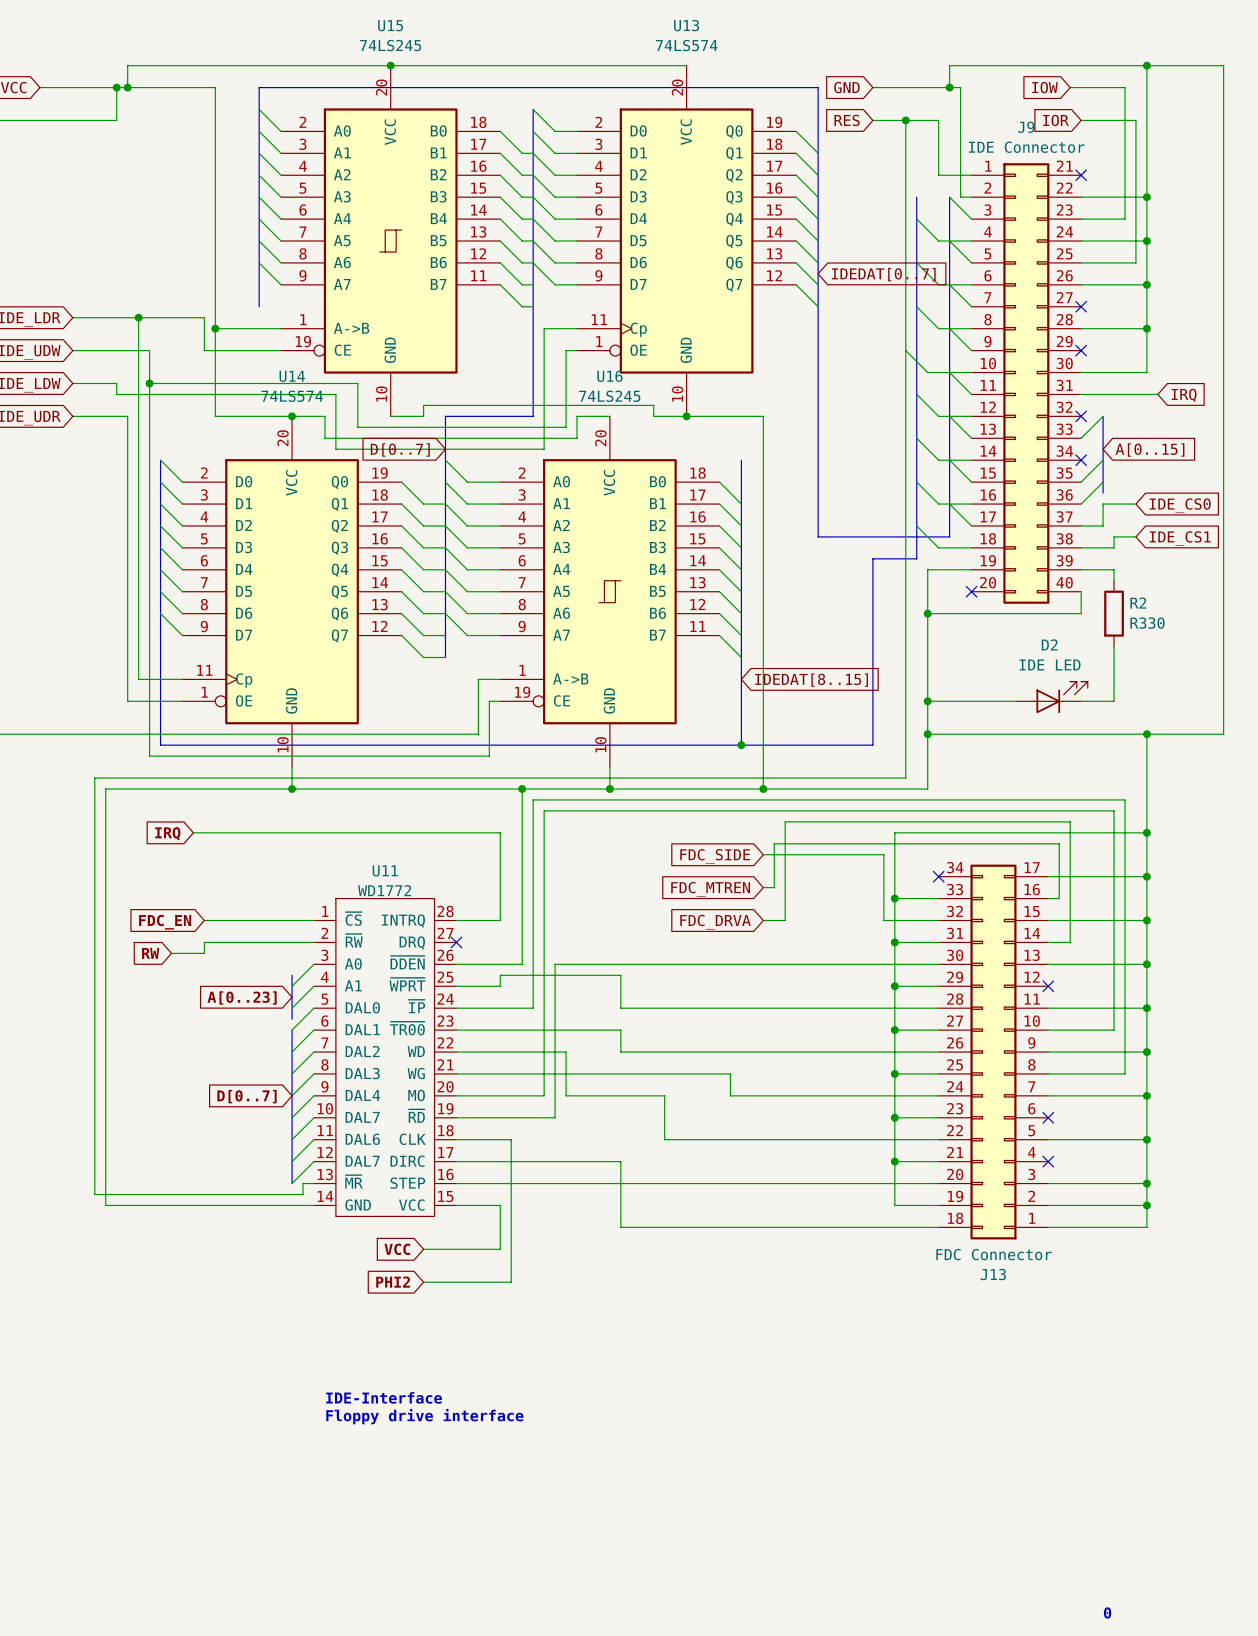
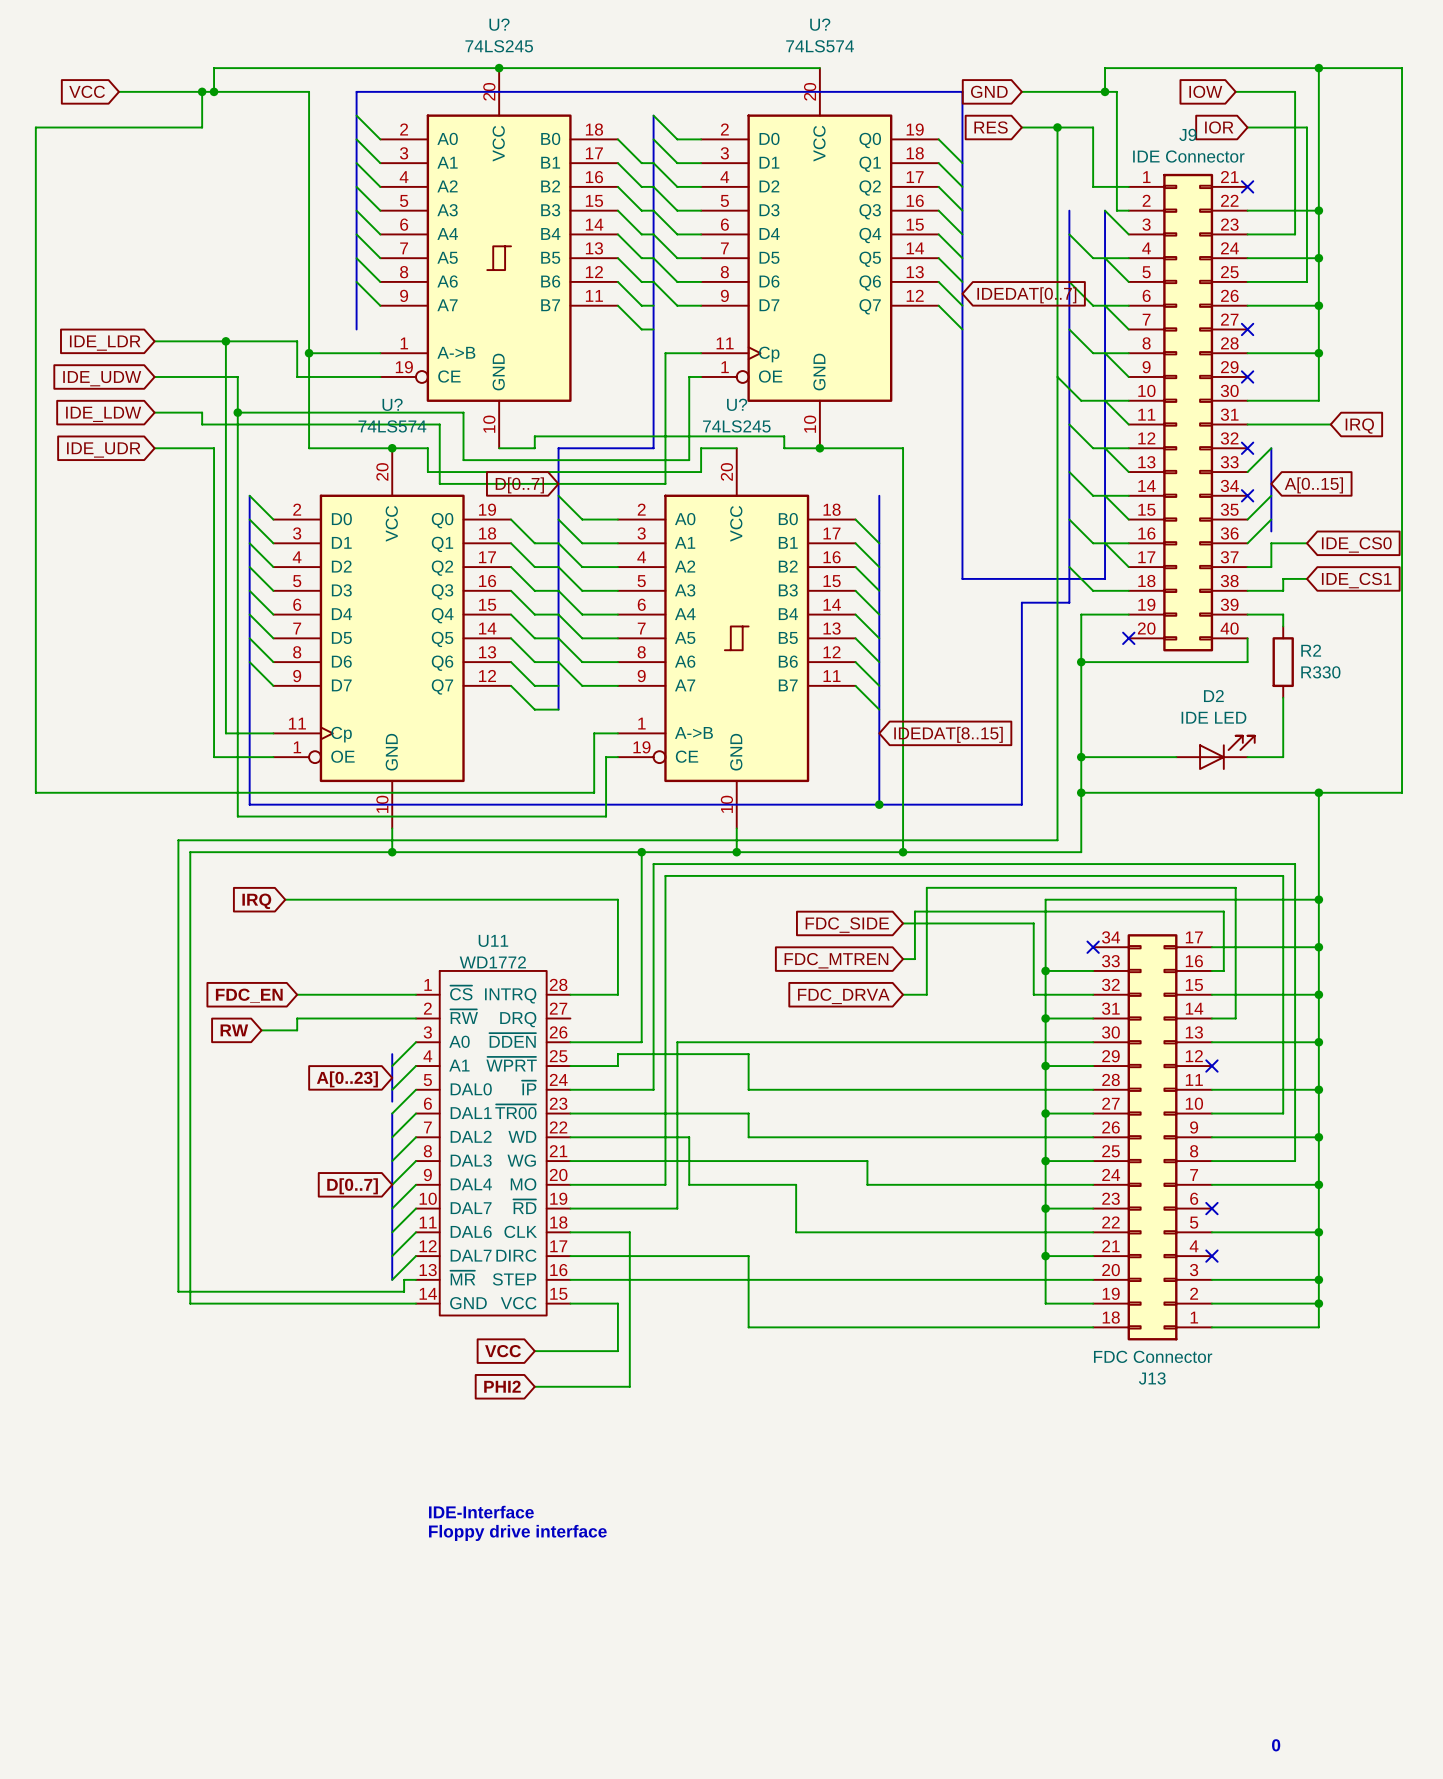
U15 name: U15 (390, 25) -> U? (499, 24)
U13 name: U13 (686, 25) -> U? (820, 24)
U14 name: U14 (292, 376) -> U? (392, 404)
U16 name: U16 (609, 376) -> U? (737, 404)
no-connect mark: (456, 942) -> none

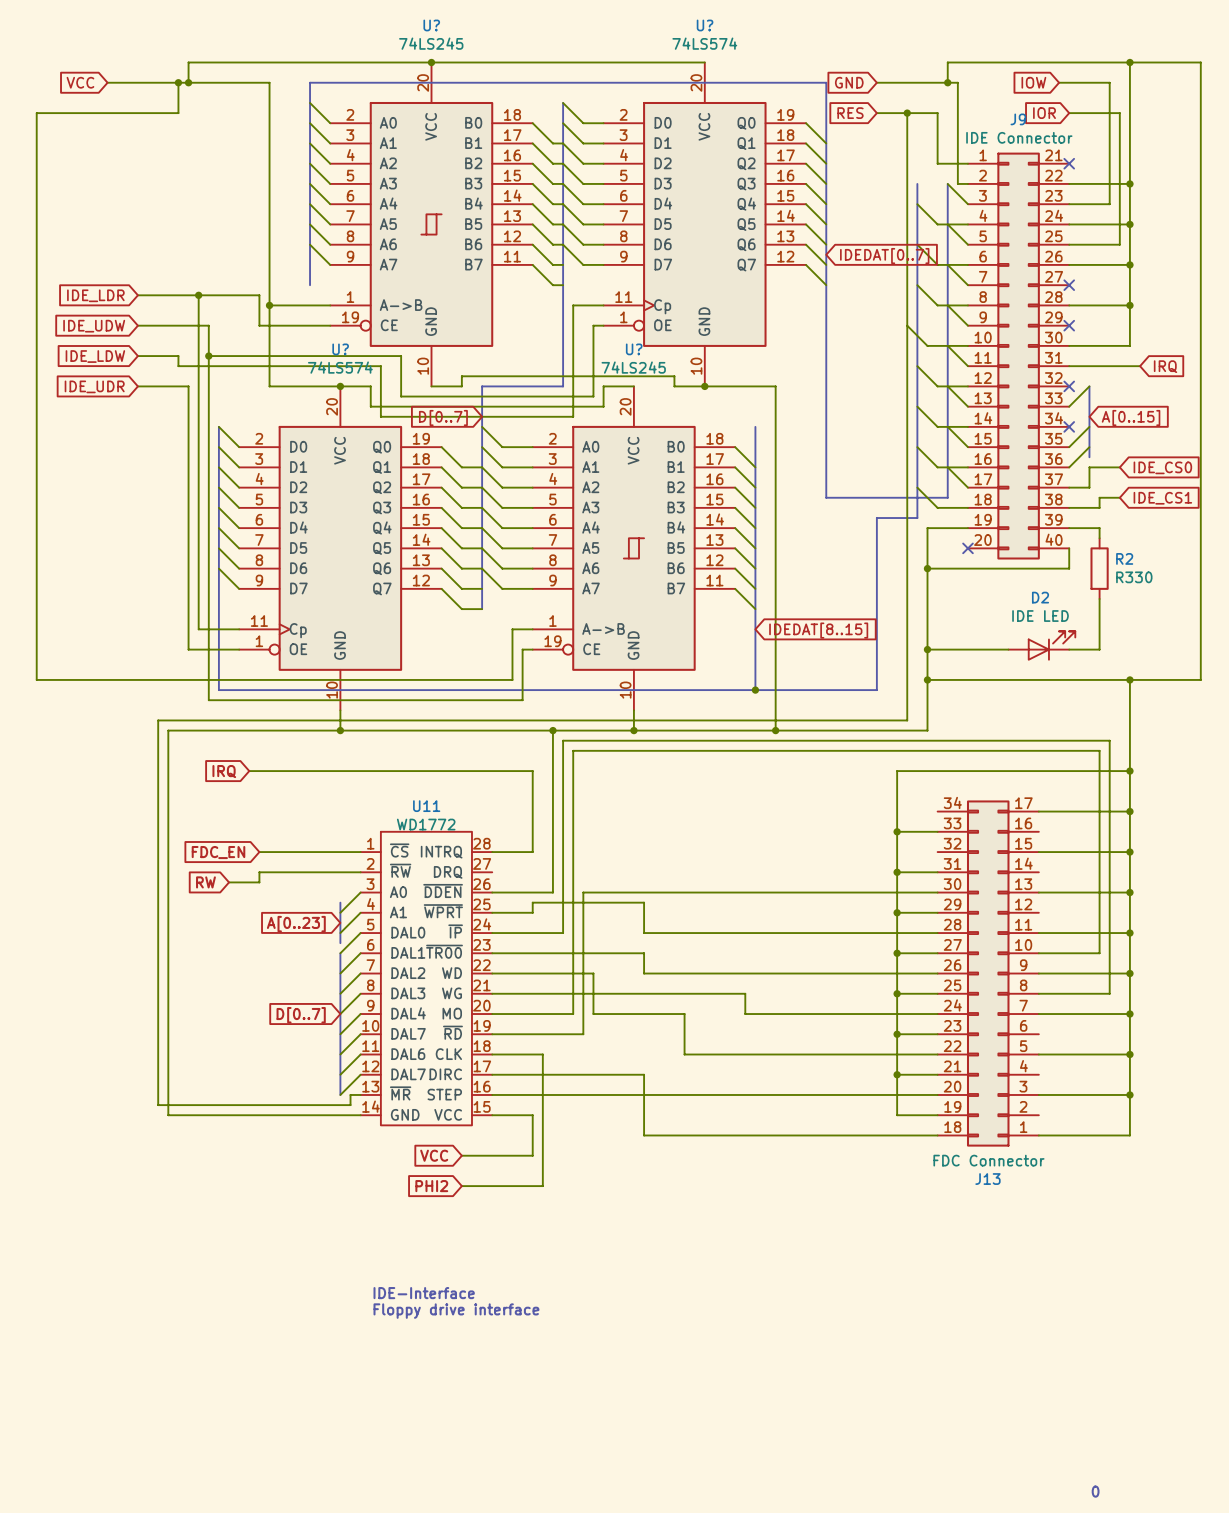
wire: (903, 923) (1033, 923) (1033, 994) (1093, 994) -> none
global label: FDC_SIDE (847, 925) -> none
no-connect mark: (1093, 947) -> none
wire: (903, 959) (914, 959) (914, 911) (1223, 911) (1223, 970) (1211, 970) -> none
global label: FDC_MTREN (836, 960) -> none
wire: (903, 994) (926, 994) (926, 887) (1235, 887) (1235, 1018) (1211, 1018) -> none
global label: FDC_DRVA (843, 996) -> none
no-connect mark: (1211, 1066) -> none
no-connect mark: (1211, 1208) -> none
no-connect mark: (1211, 1256) -> none
wire: (1211, 1303) (1318, 1303) -> none
junction: (1318, 1303) -> none

